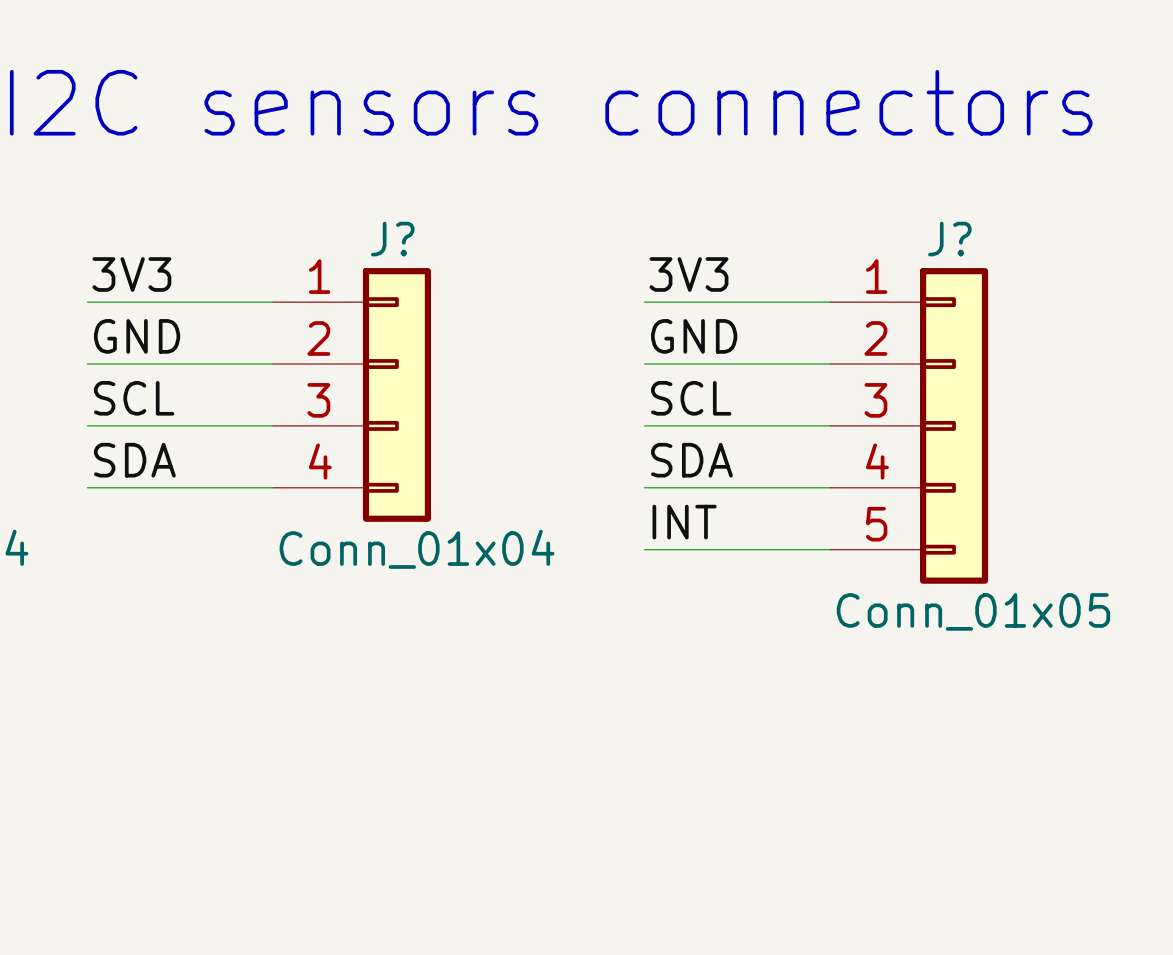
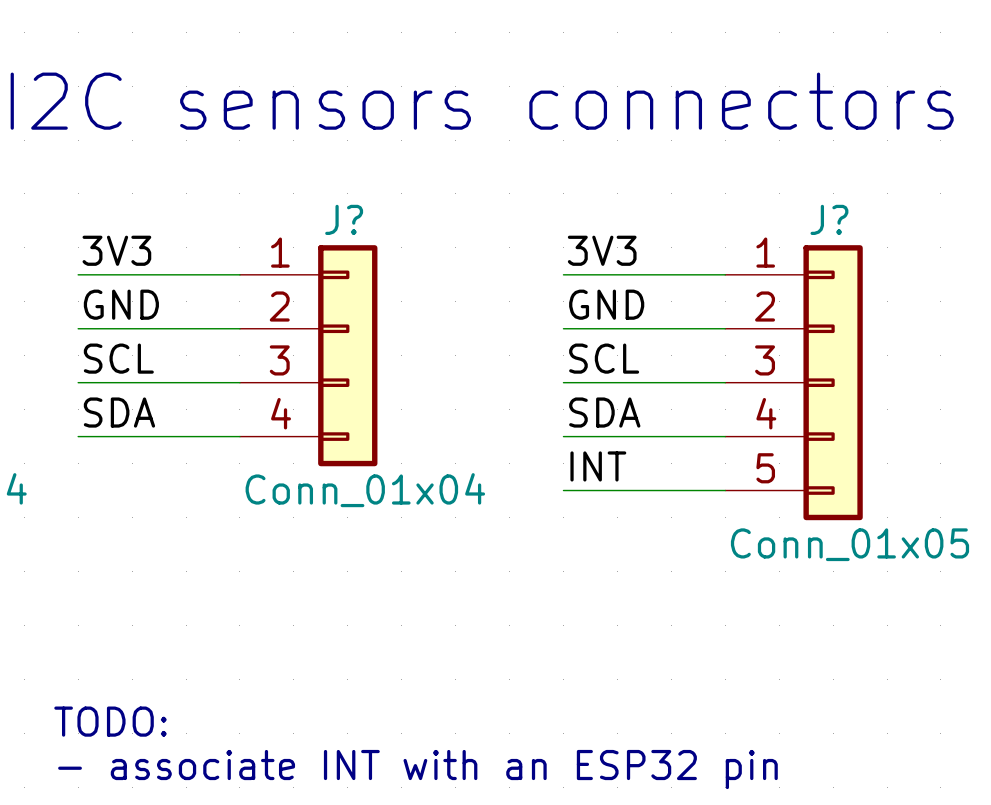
text: none -> TODO: (110, 721)
text: none -> - associate INT with an ESP32 pin (417, 769)

